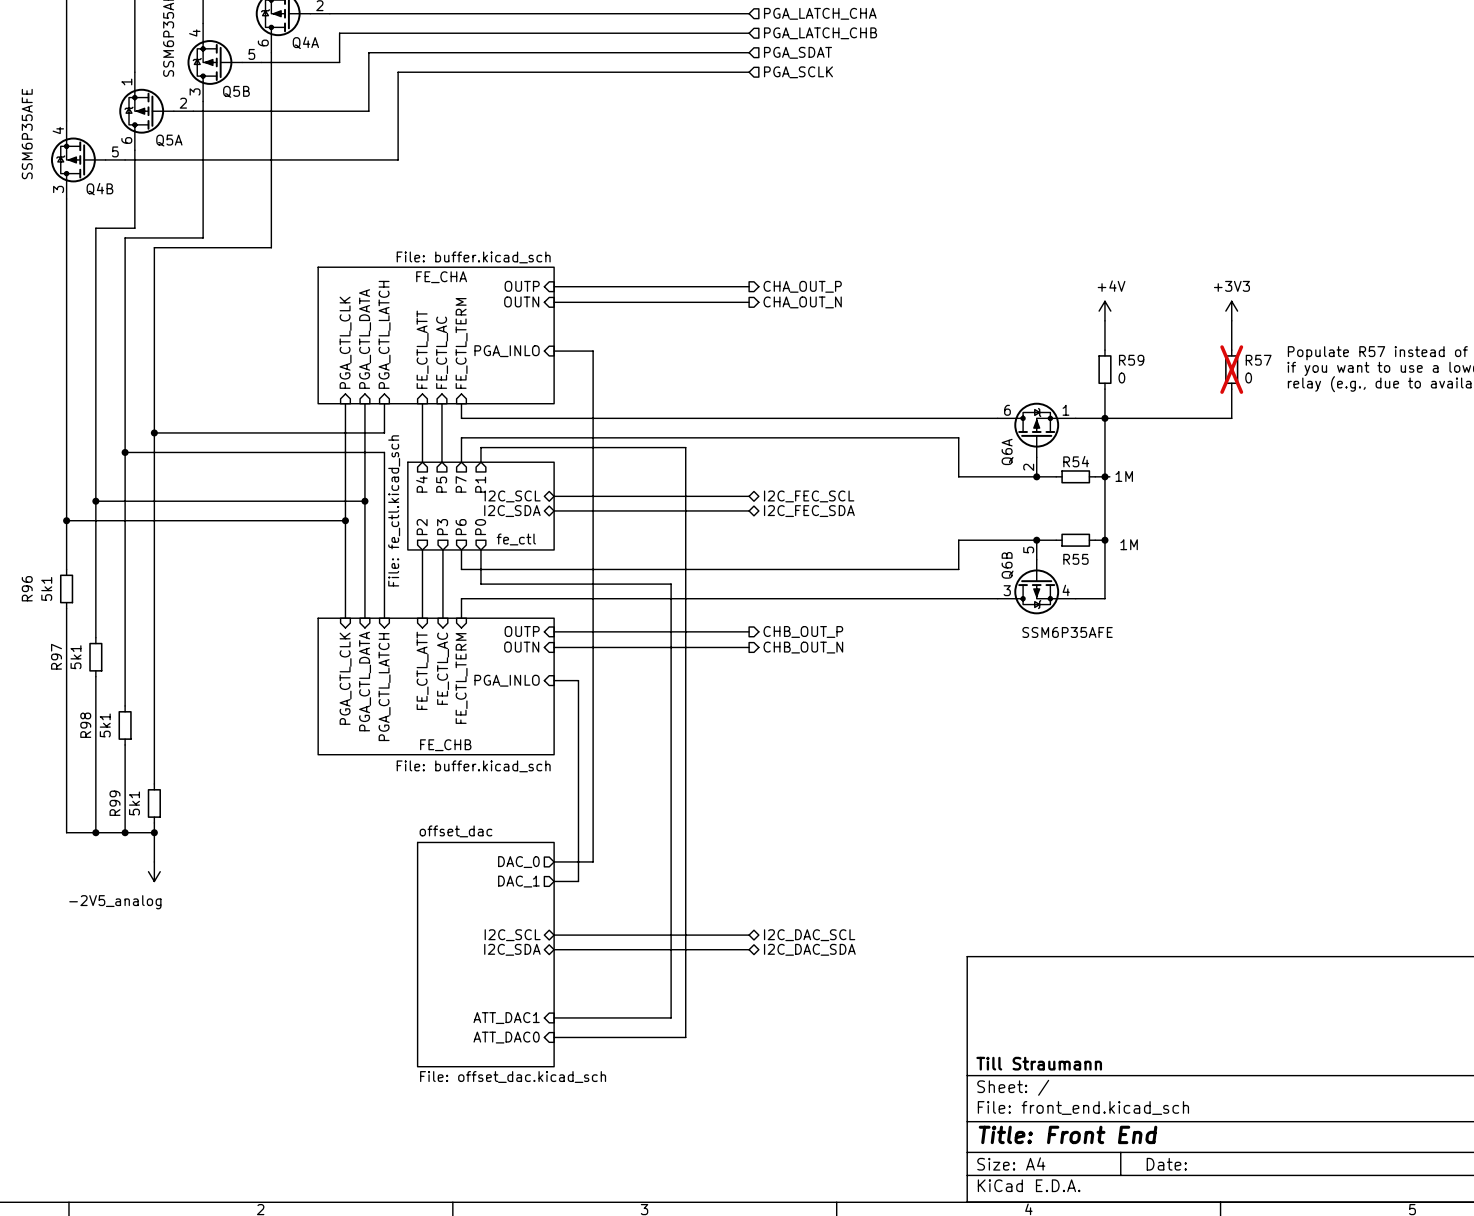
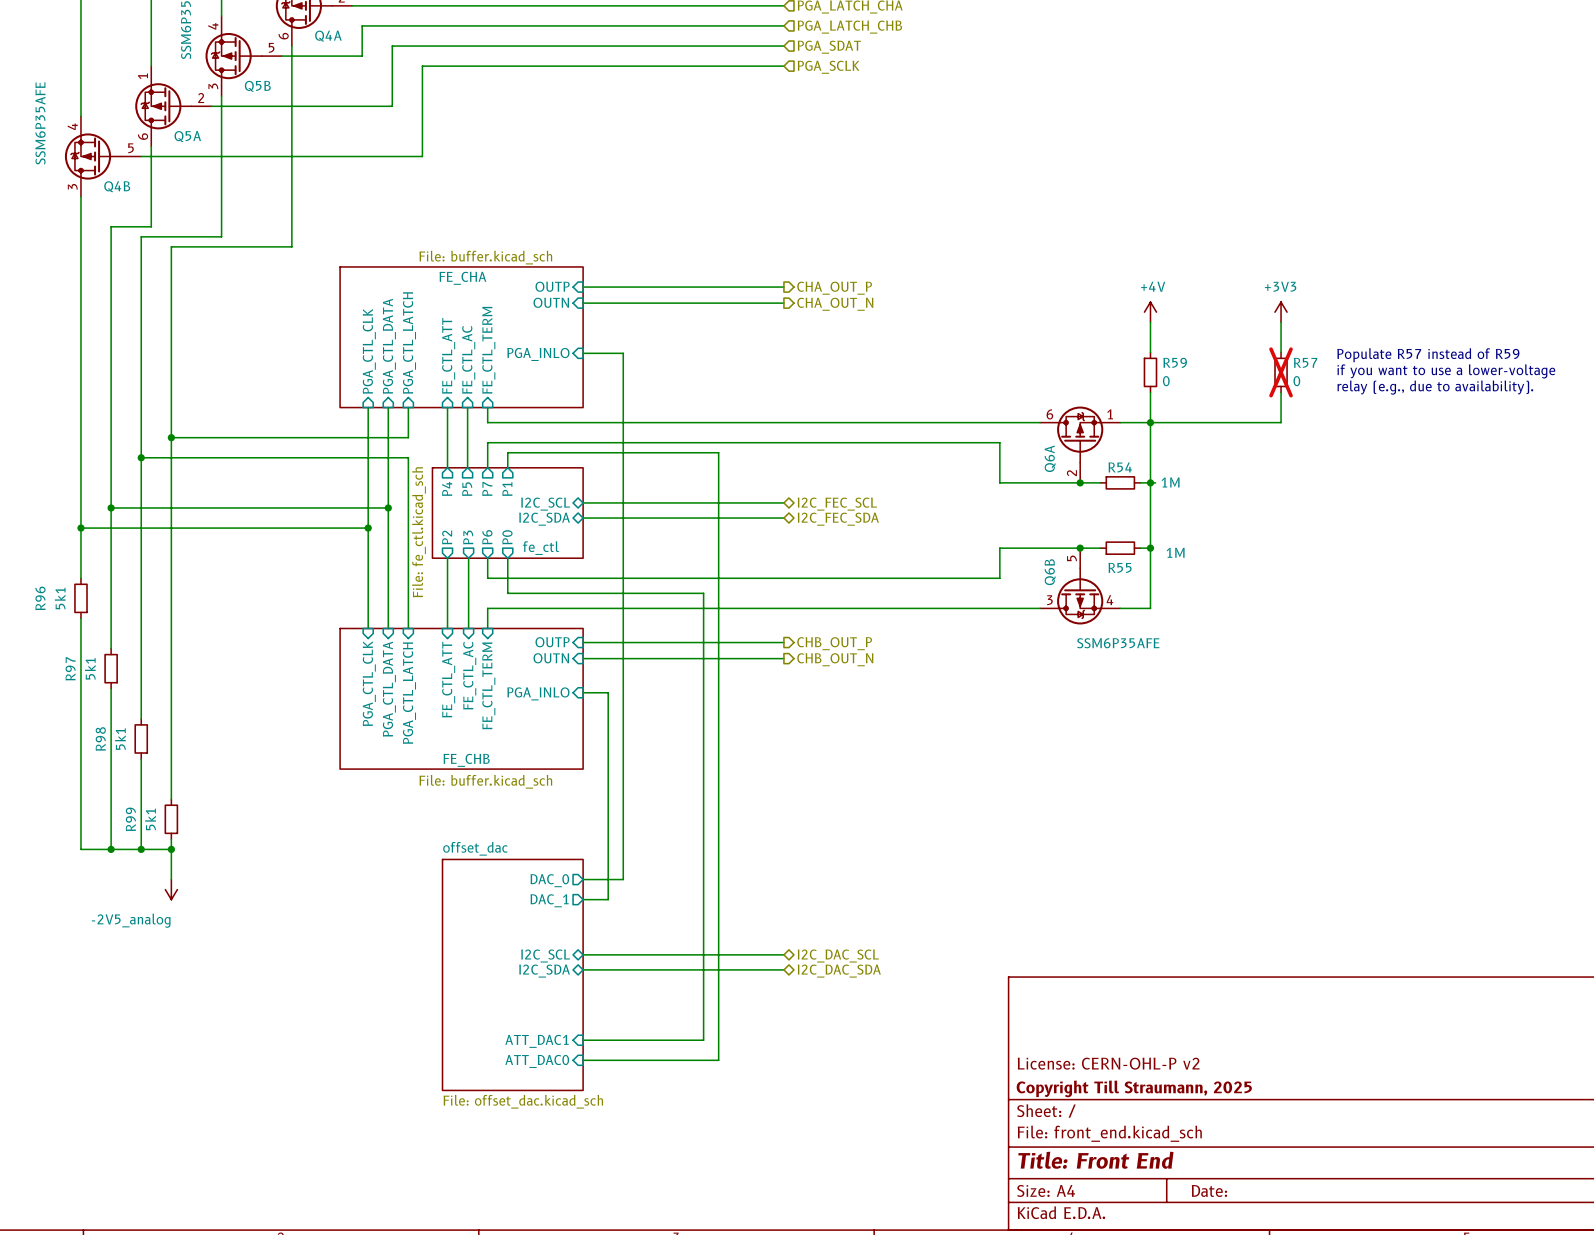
title block: none -> License: CERN-OHL-P v2 (1108, 1063)
title block: Till Straumann (1039, 1063) -> Copyright Till Straumann, 2025 (1134, 1088)

